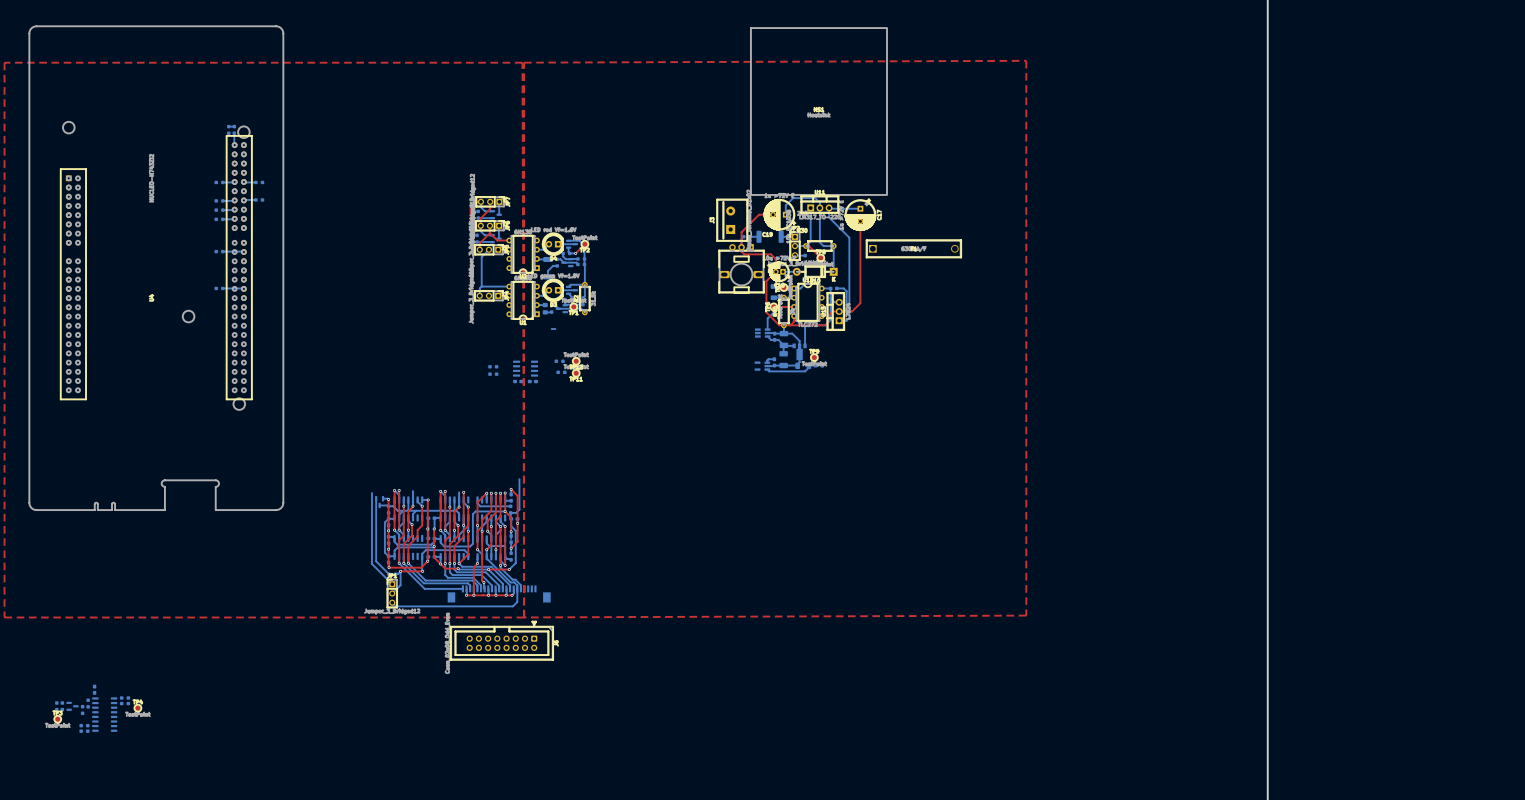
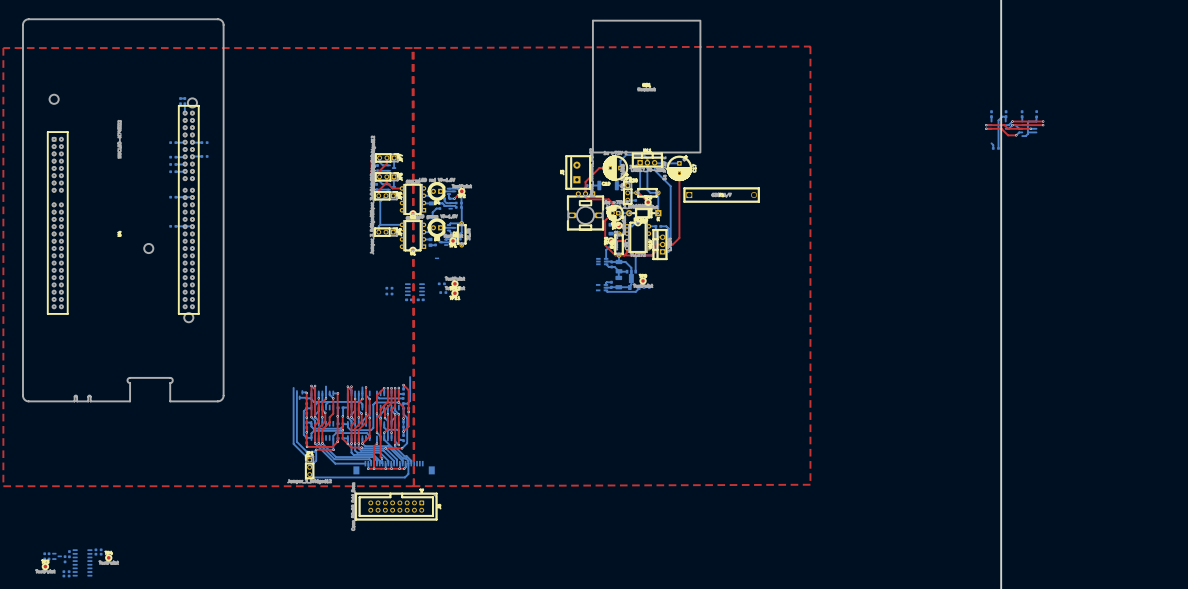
part: none -> (991, 114)
part: none -> (1006, 114)
part: none -> (1022, 114)
part: none -> (1036, 114)
bottom track: none -> (991, 116) (991, 121)
bottom track: none -> (1022, 116) (1022, 121)
bottom track: none -> (1036, 116) (1036, 121) (1027, 122) (1027, 133) (1022, 136)
bottom track: none -> (1005, 121) (1005, 116) (1002, 116) (998, 120) (998, 147)
top track: none -> (1012, 121) (1043, 121)
bottom track: none -> (1012, 121) (1005, 125)
via: none -> (1012, 121)
via: none -> (1043, 121)
top track: none -> (986, 125) (1004, 125) (1008, 128) (1030, 128)
via: none -> (986, 125)
top track: none -> (1012, 125) (1043, 125)
via: none -> (1012, 125)
via: none -> (1043, 125)
top track: none -> (986, 128) (1001, 128) (1008, 135) (1016, 135)
via: none -> (986, 128)
bottom track: none -> (1005, 128) (1012, 125) (1022, 128)
bottom track: none -> (1030, 128) (1036, 128)
via: none -> (1030, 128)
bottom track: none -> (1022, 132) (1016, 135)
bottom track: none -> (1027, 132) (1036, 132)
via: none -> (1016, 135)
bottom track: none -> (991, 143) (993, 147)
part: none -> (995, 148)
part: (94, 689) -> none

